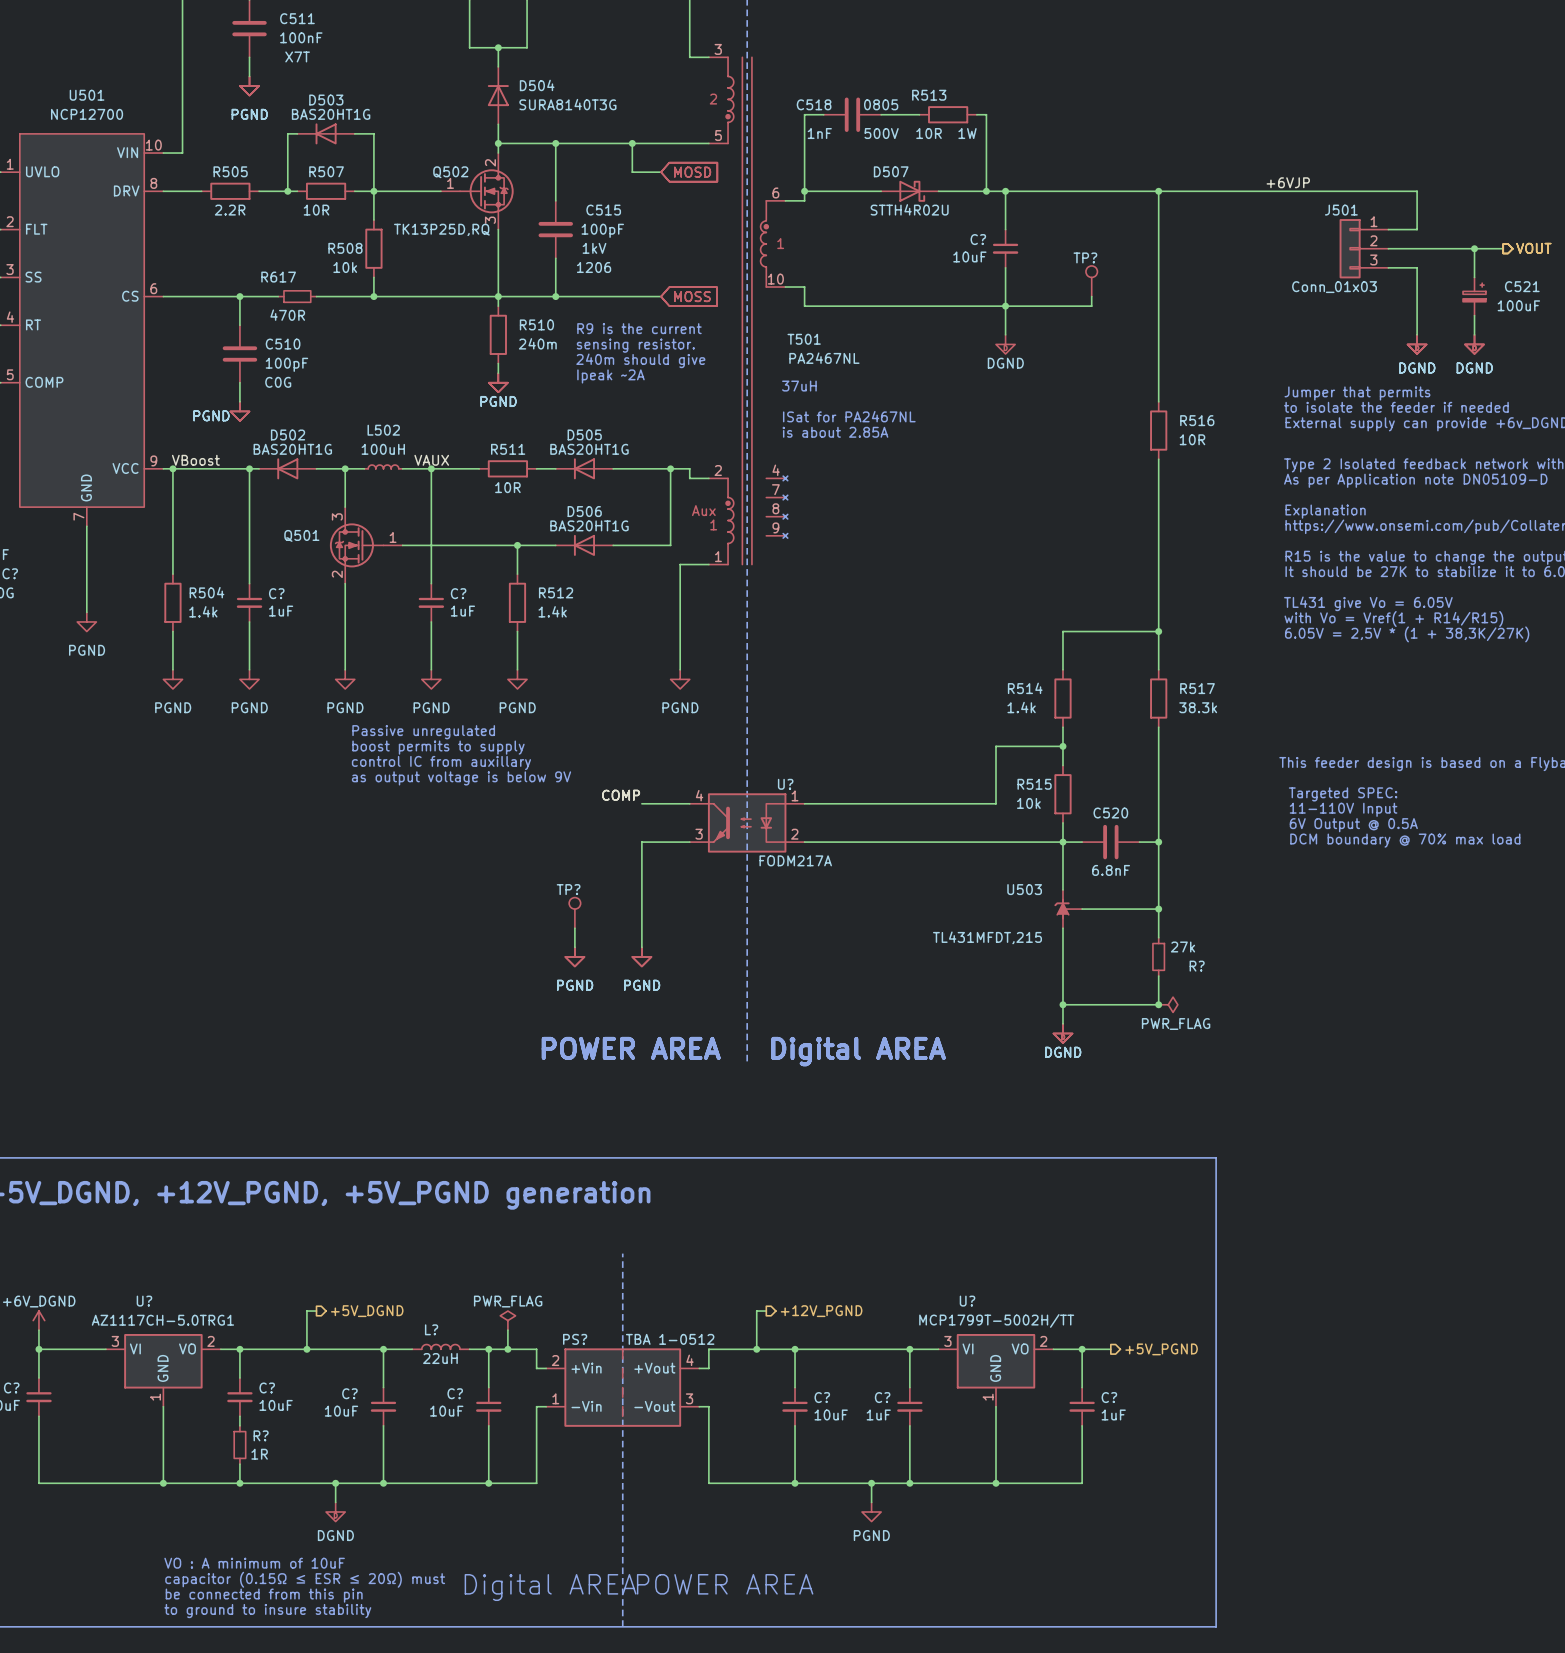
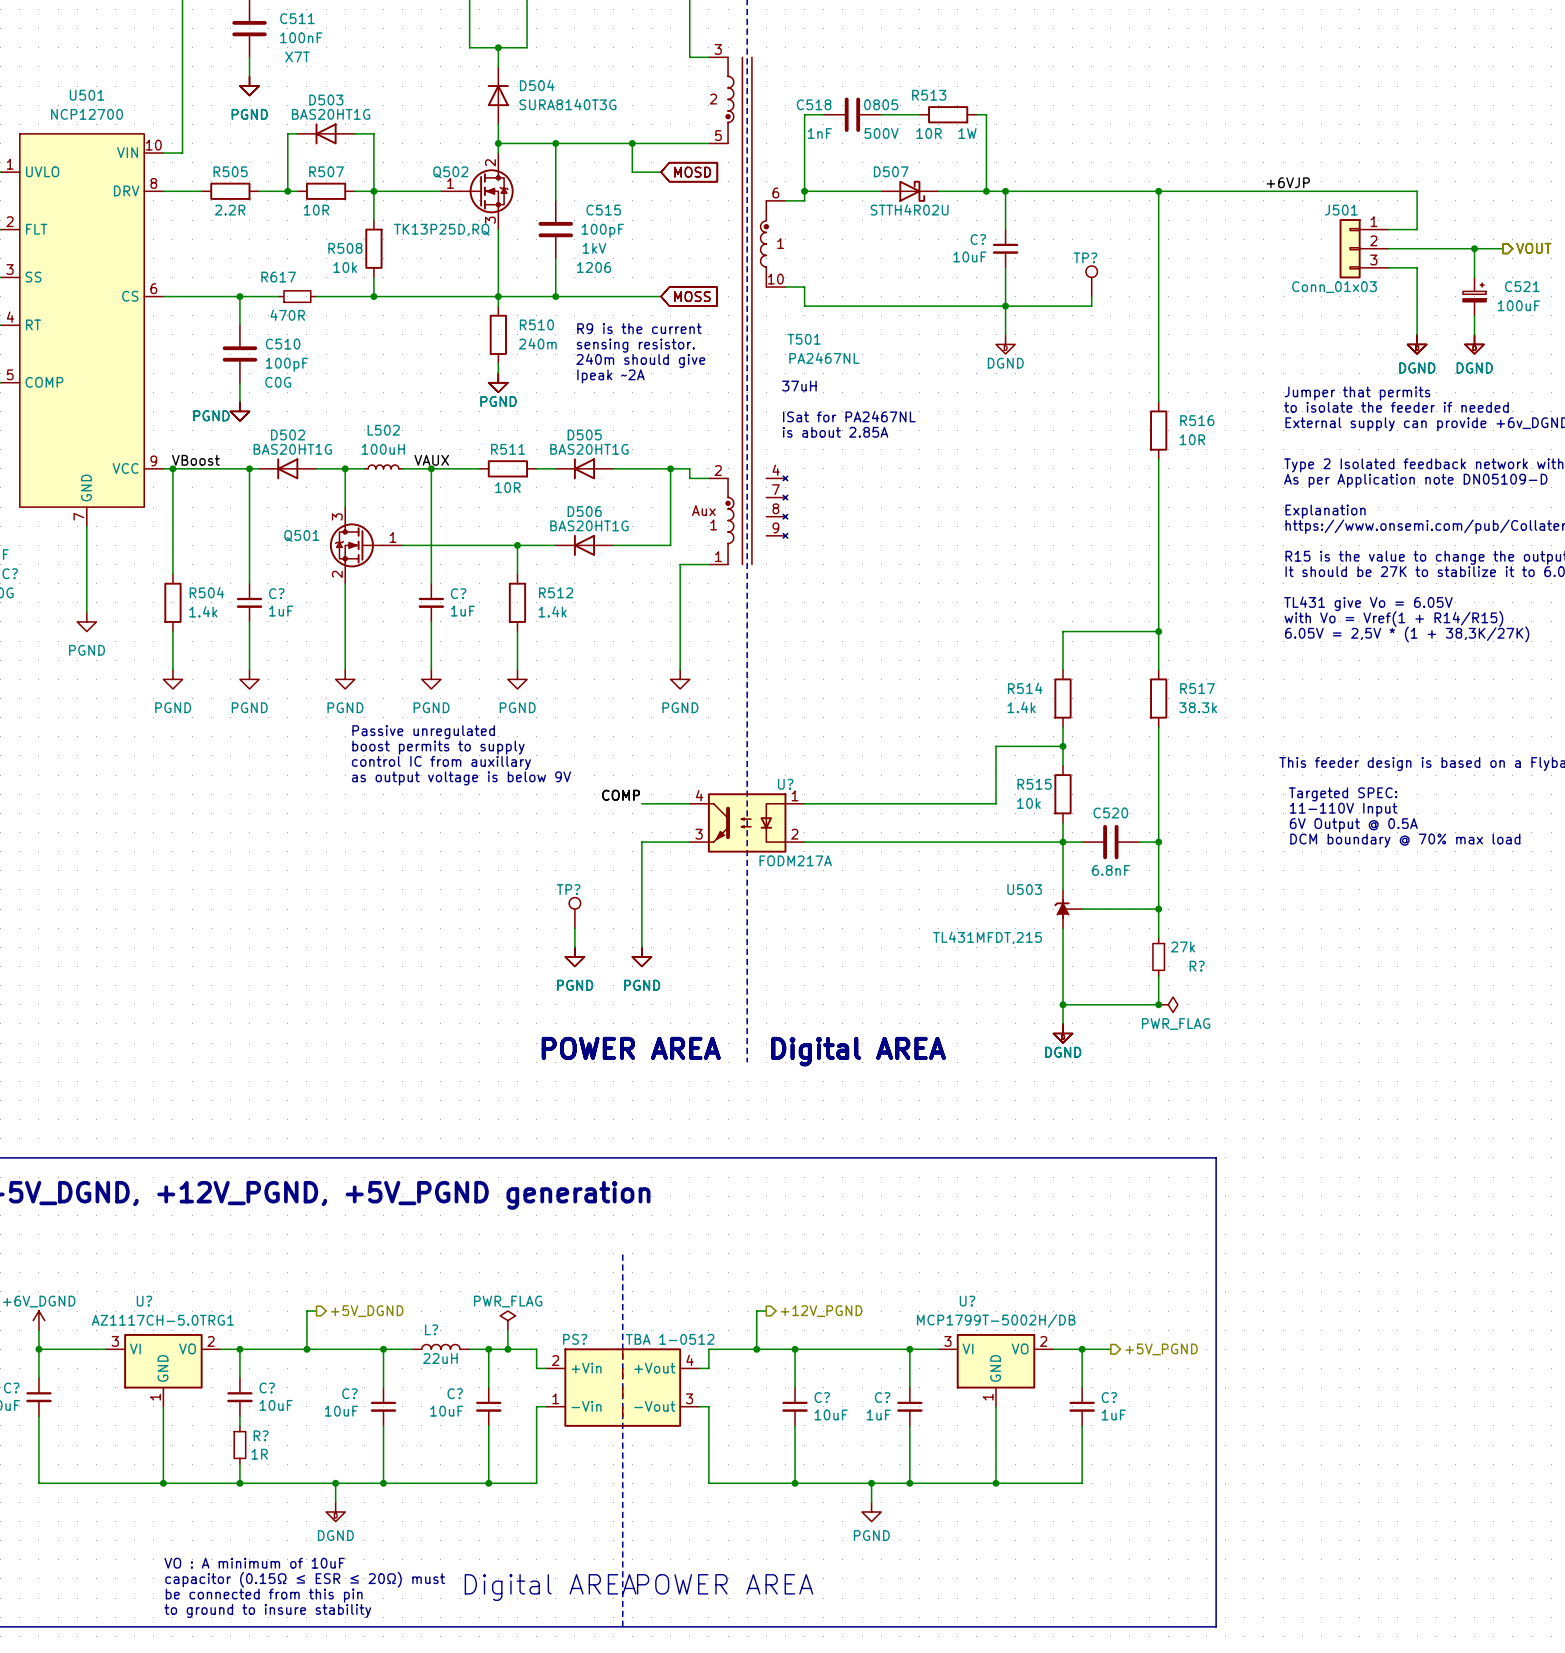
U? value: MCP1799T-5002H/TT (996, 1320) -> MCP1799T-5002H/DB (996, 1320)

